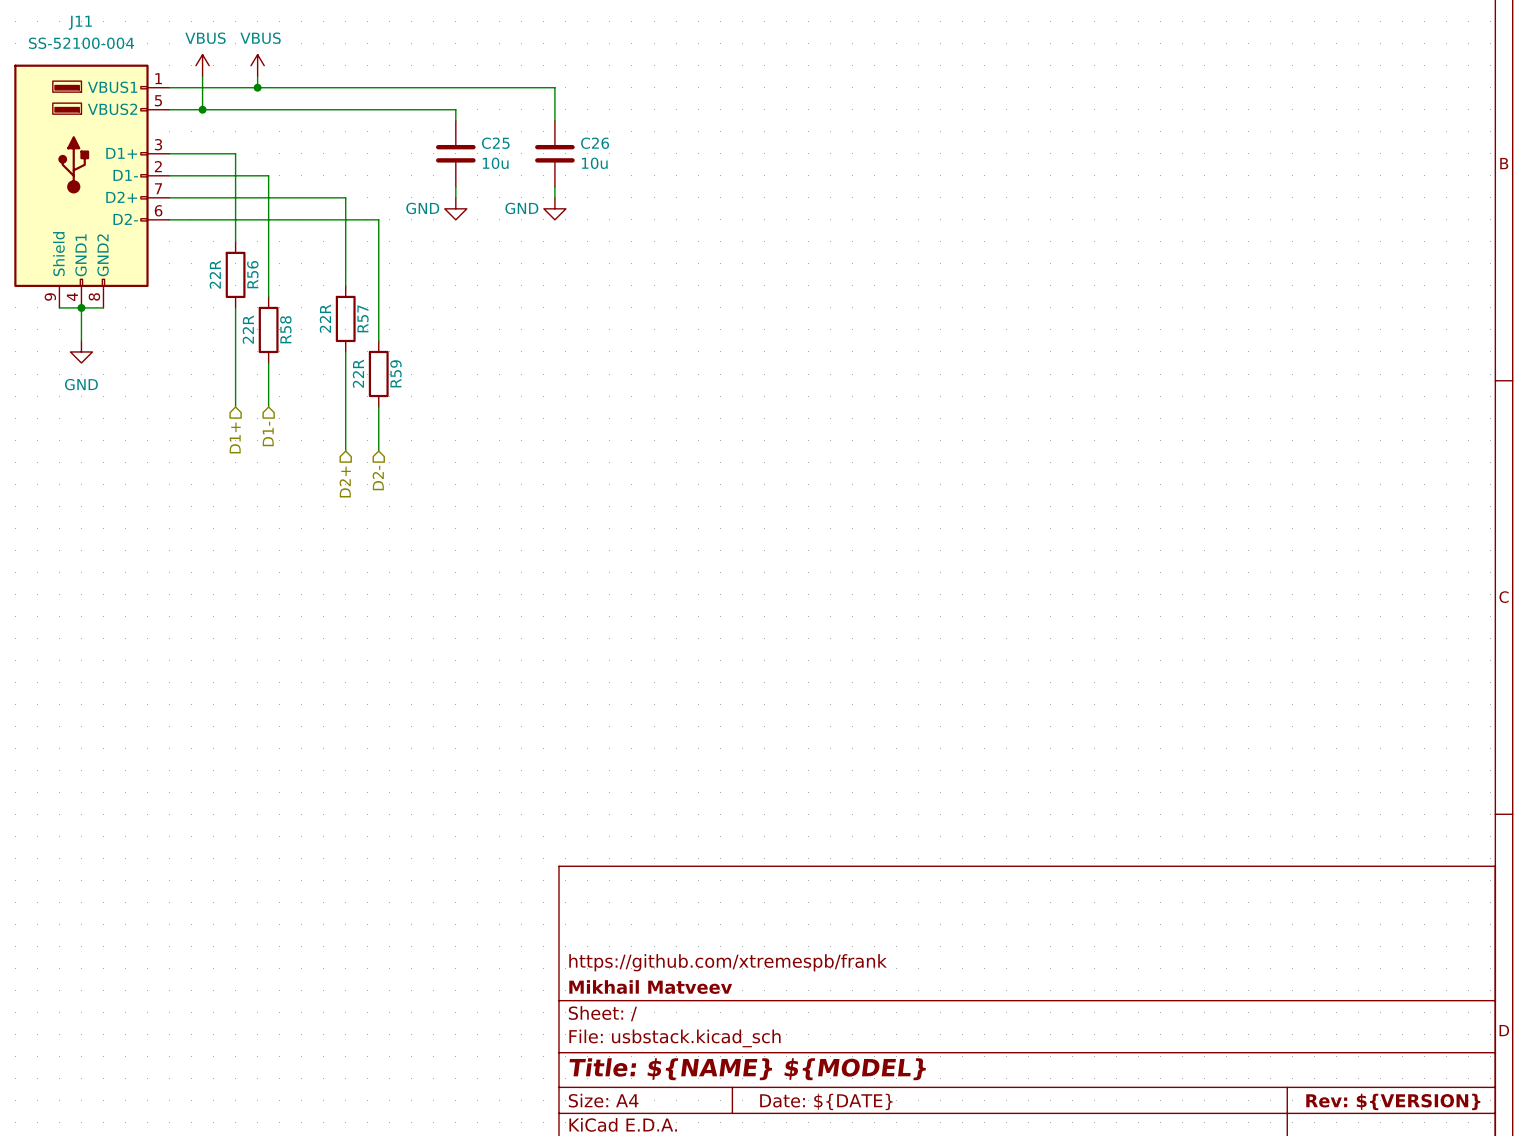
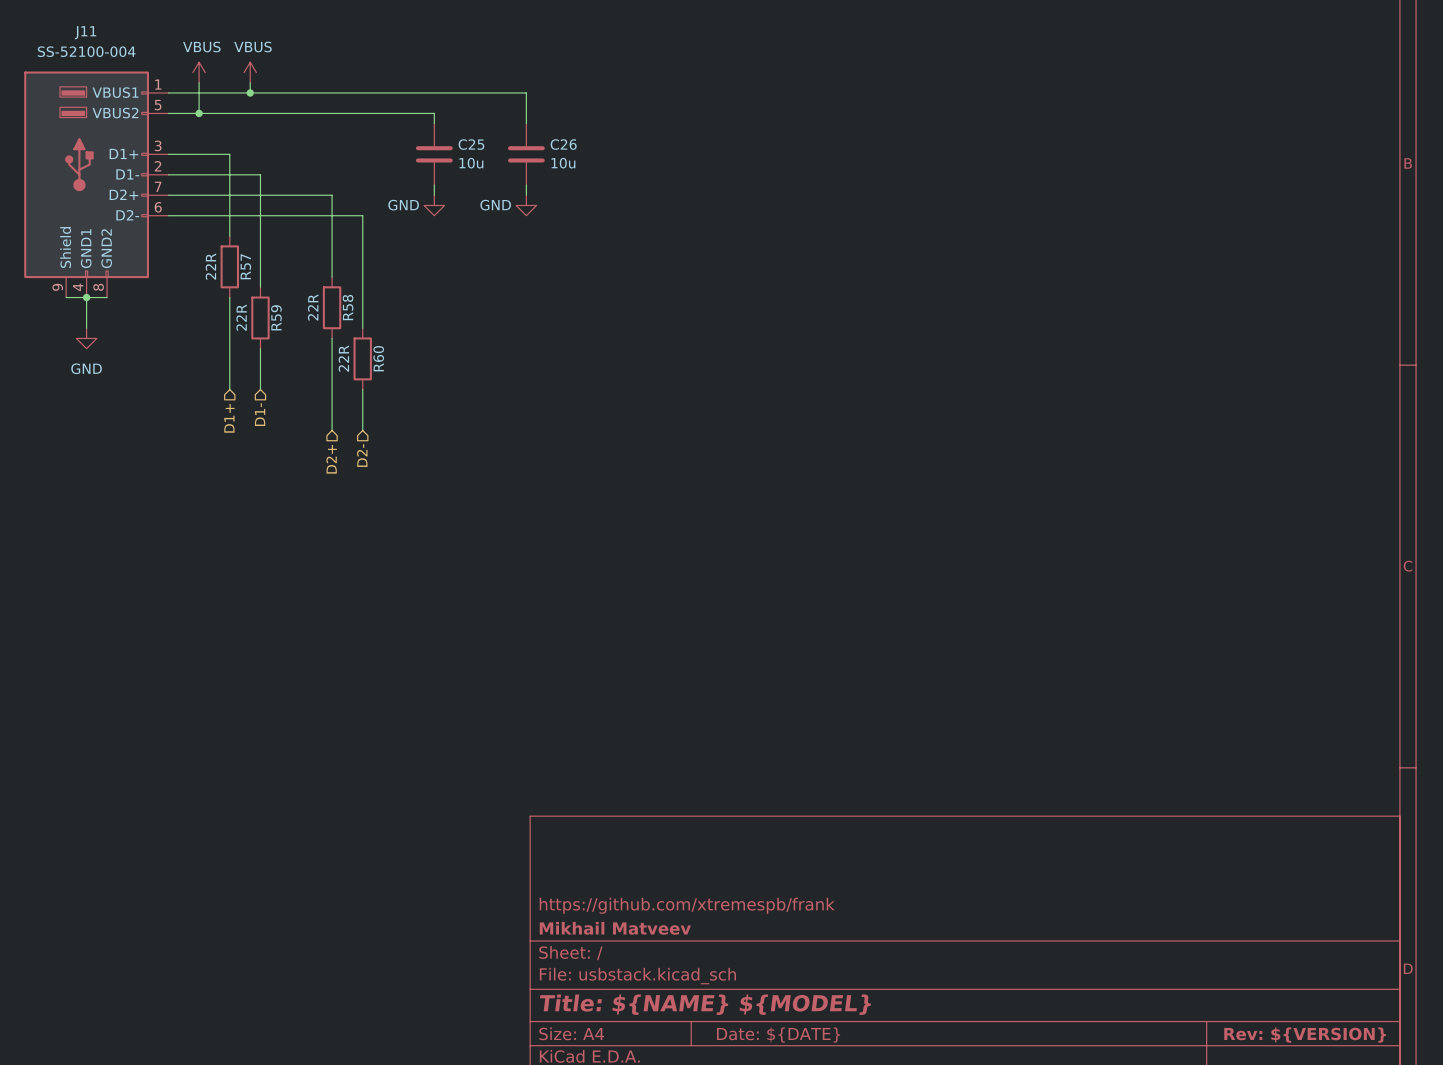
R56 name: R56 (252, 274) -> R57 (245, 266)
R57 name: R57 (363, 318) -> R58 (348, 307)
R58 name: R58 (285, 329) -> R59 (276, 317)
R59 name: R59 (395, 373) -> R60 (378, 358)

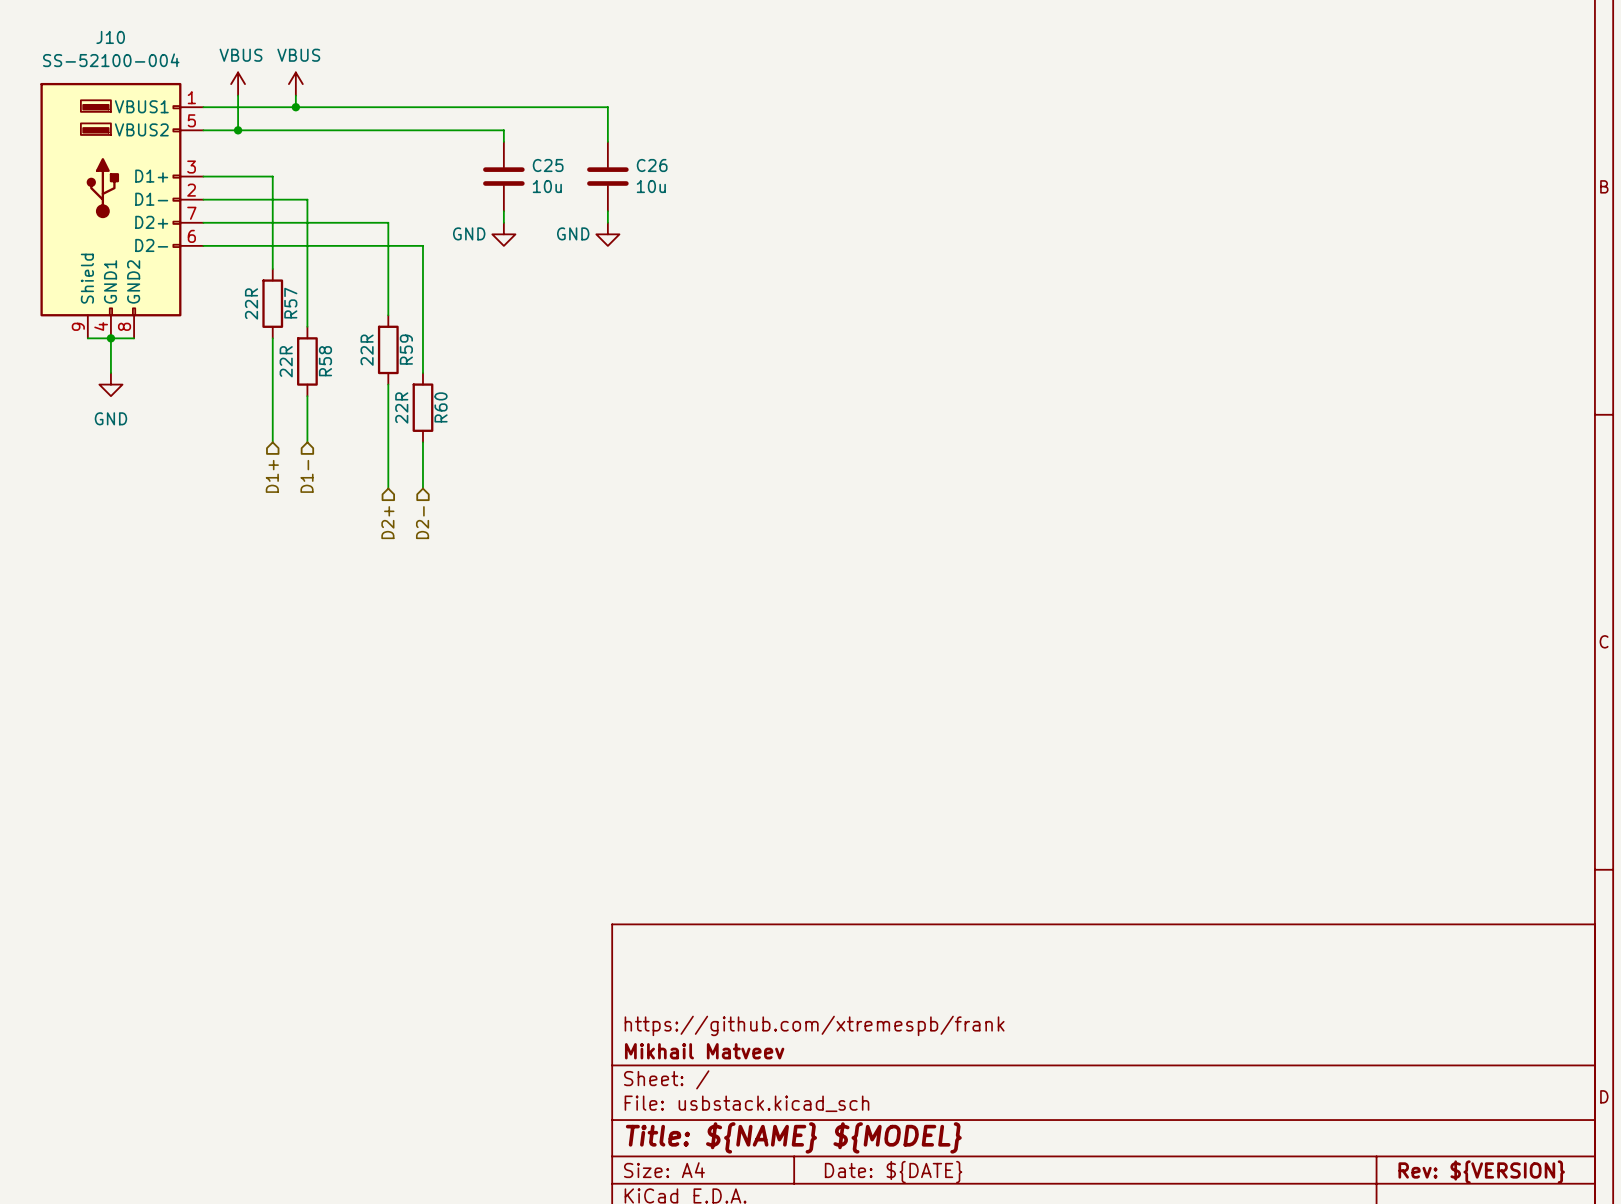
J11 name: J11 (85, 32) -> J10 (110, 37)
R58 name: R58 (348, 307) -> R59 (406, 349)
R59 name: R59 (276, 317) -> R58 (325, 361)

